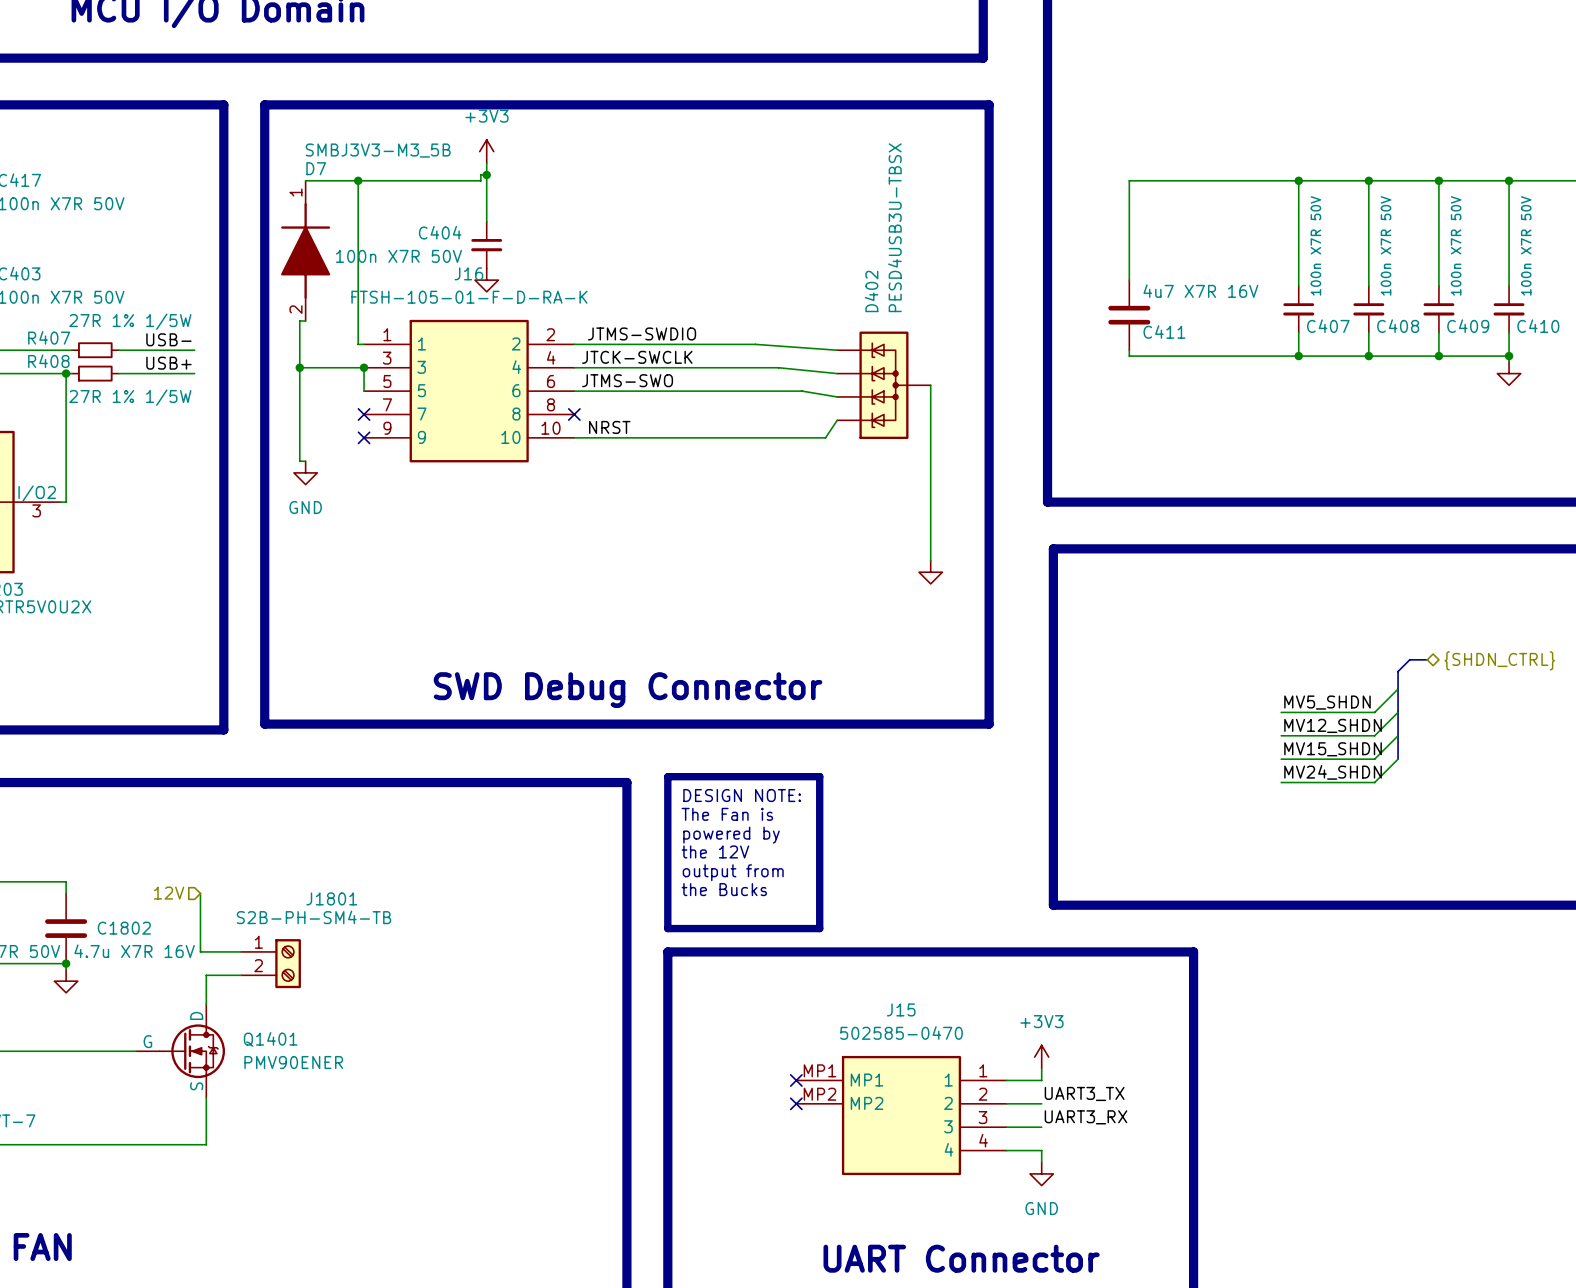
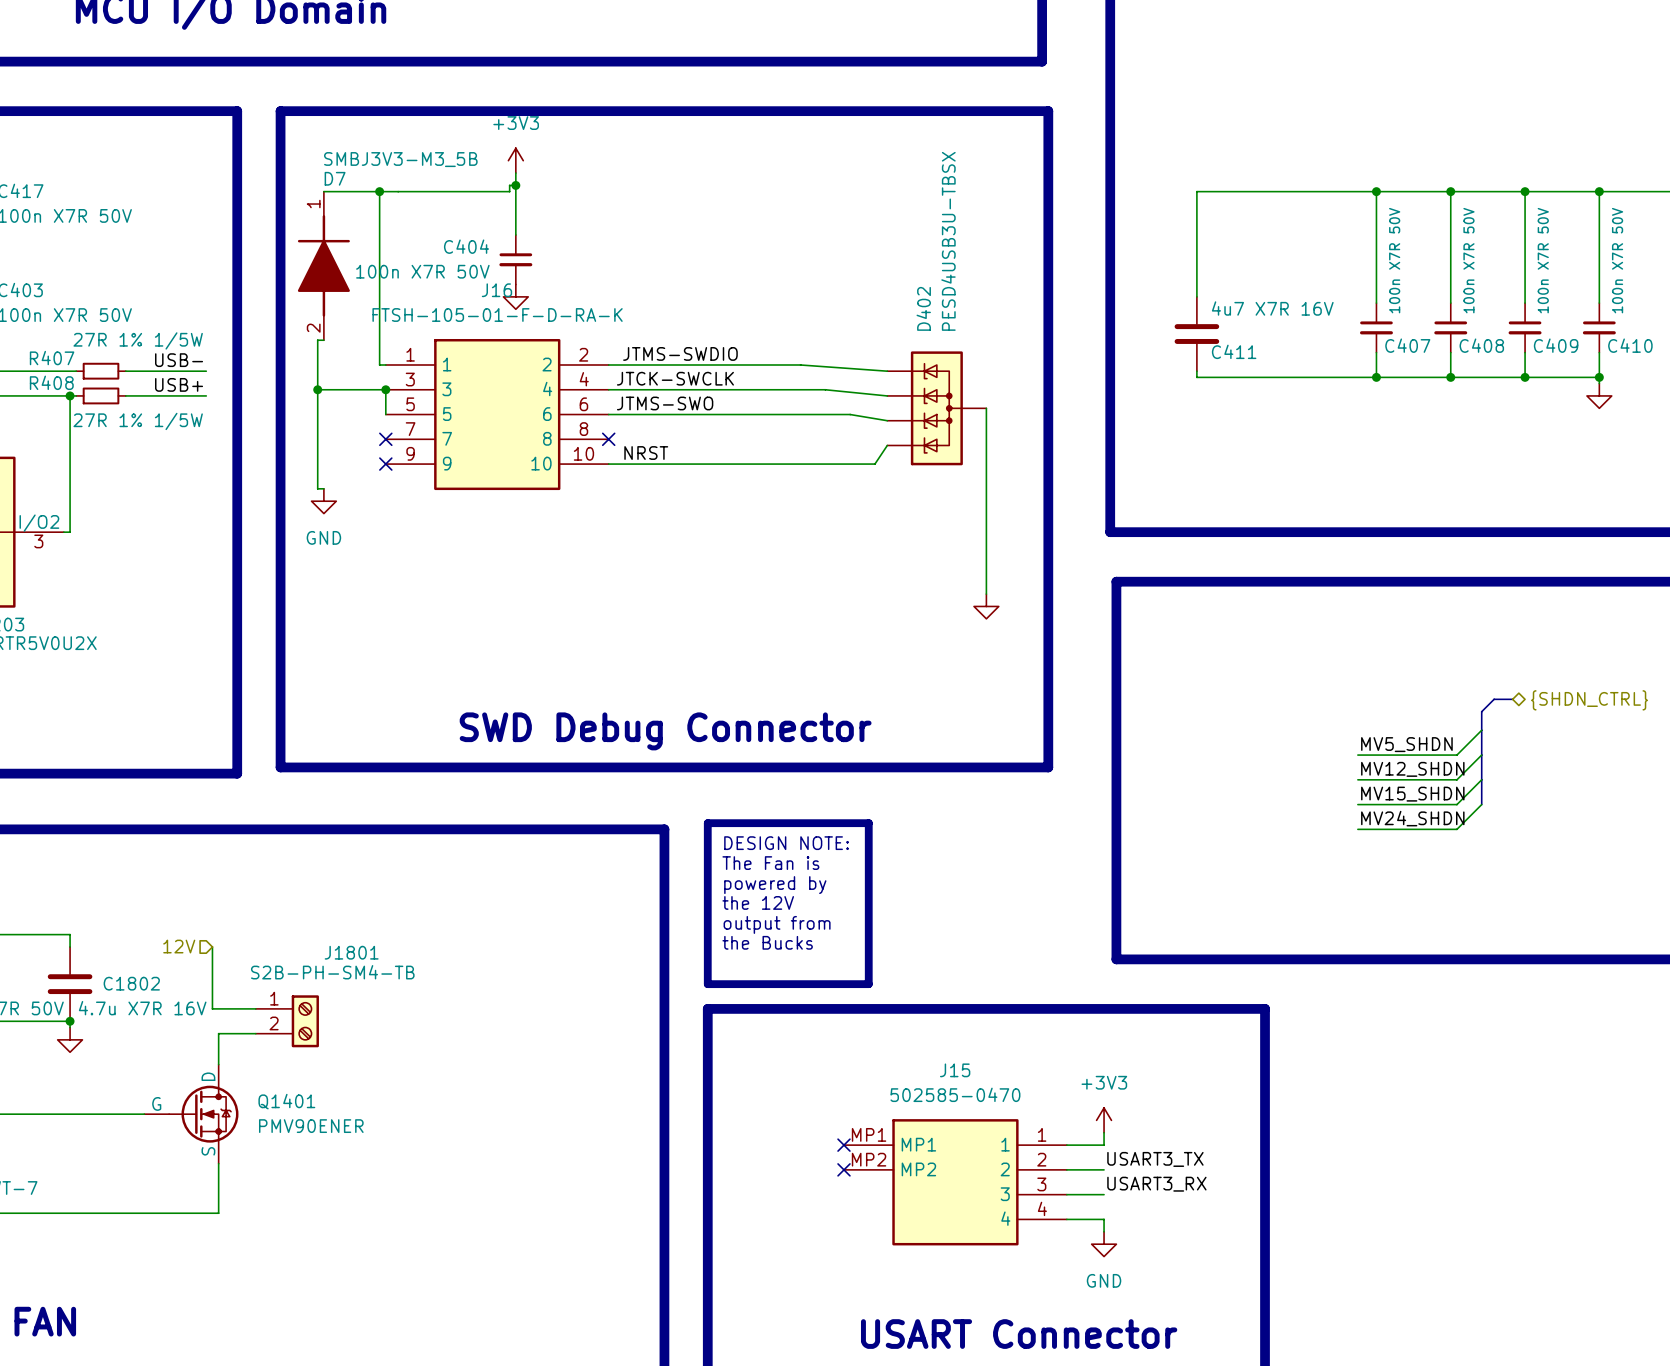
label: UART3_TX (1084, 1093) -> USART3_TX (1155, 1159)
label: UART3_RX (1086, 1117) -> USART3_RX (1156, 1184)
text: UART Connector (961, 1258) -> USART Connector (1019, 1334)

